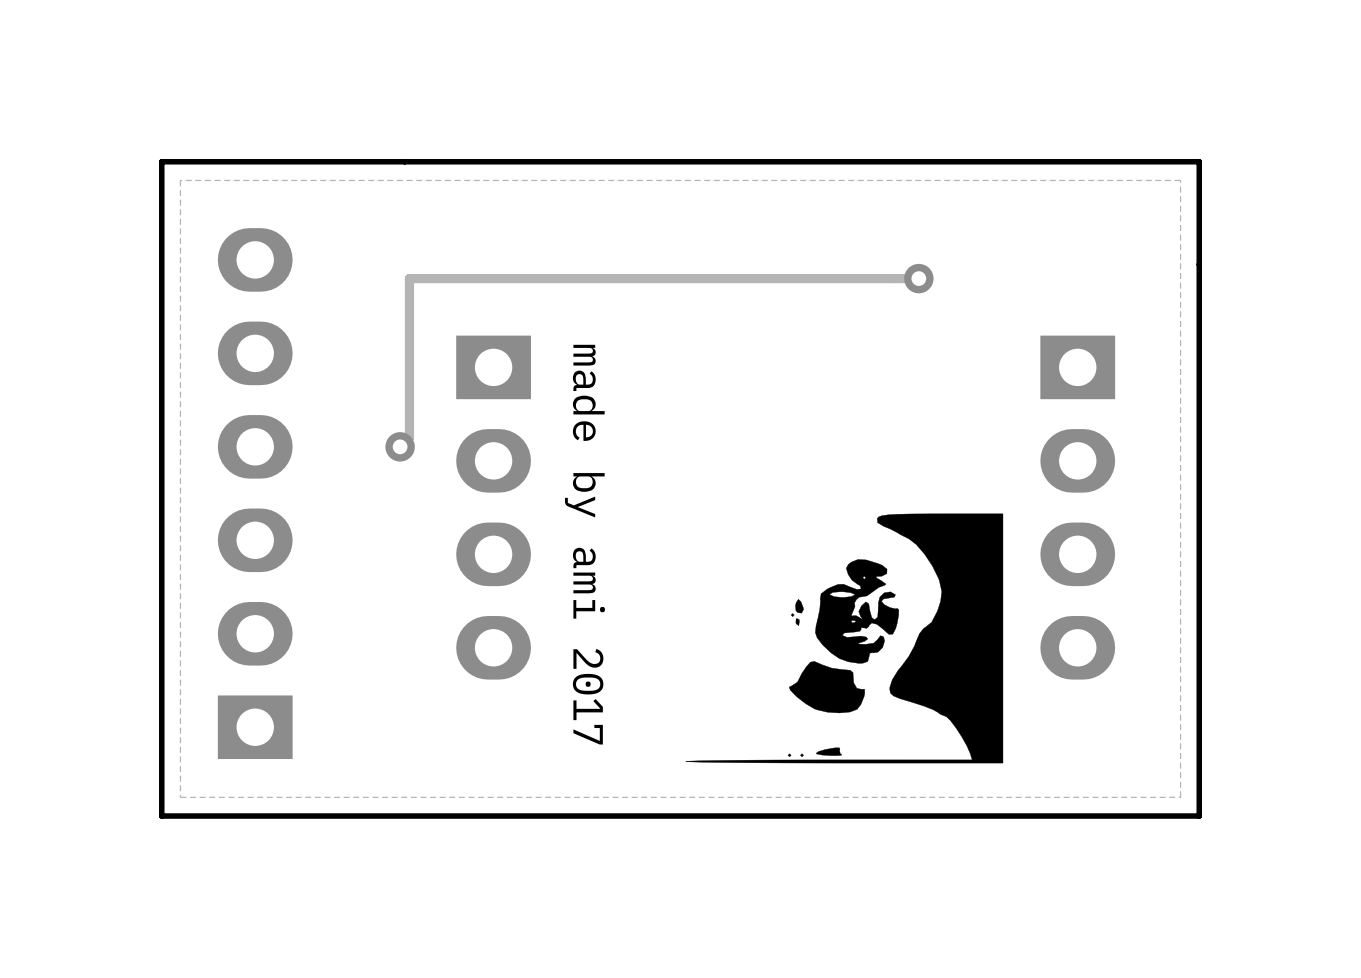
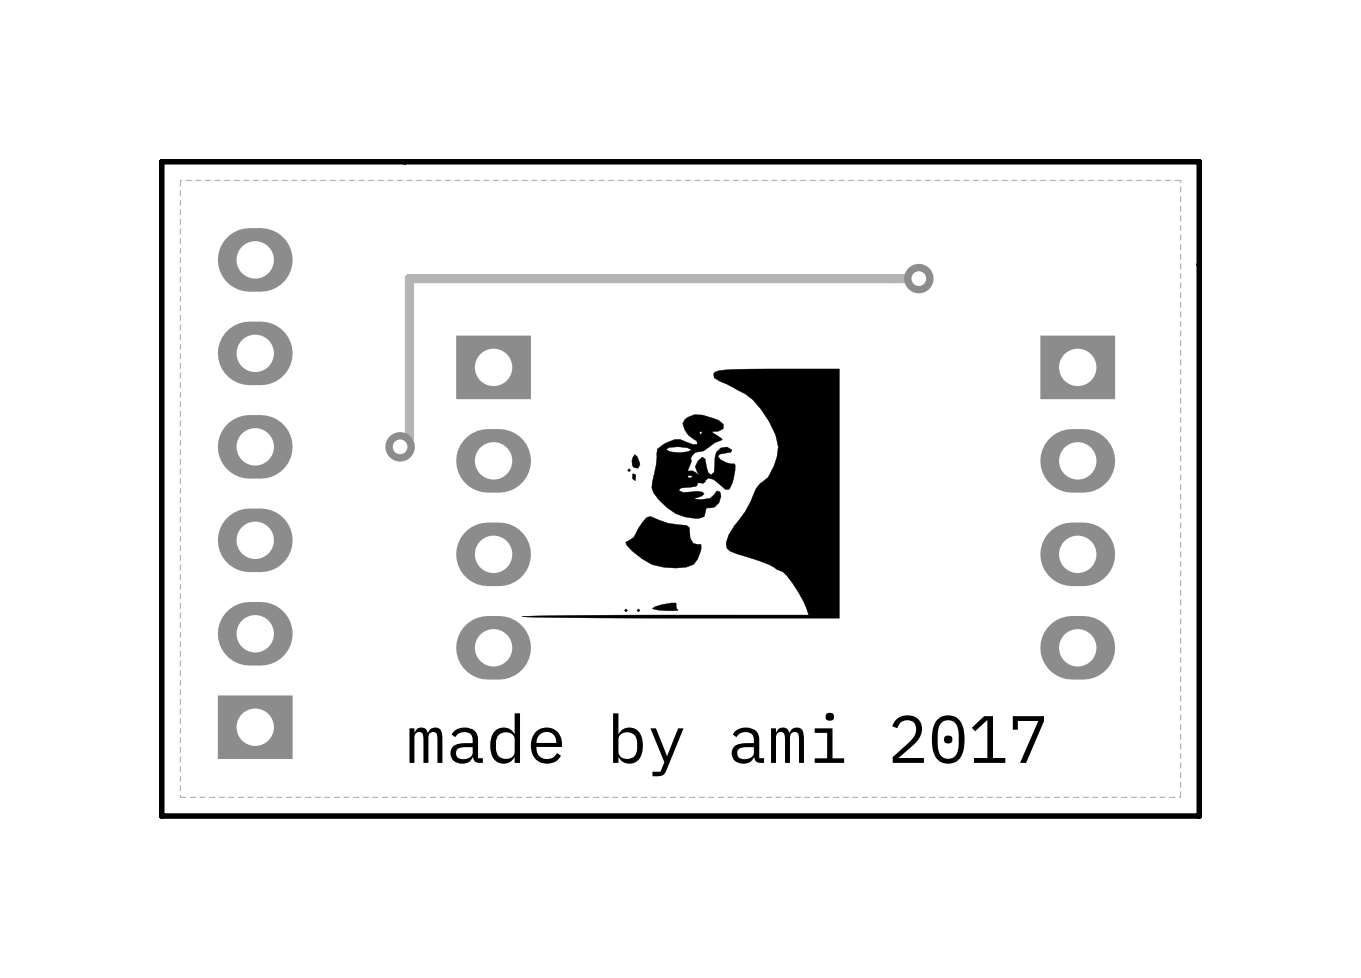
drawing: none -> [521, 368, 840, 619]
drawing: [685, 513, 1004, 764] -> none

